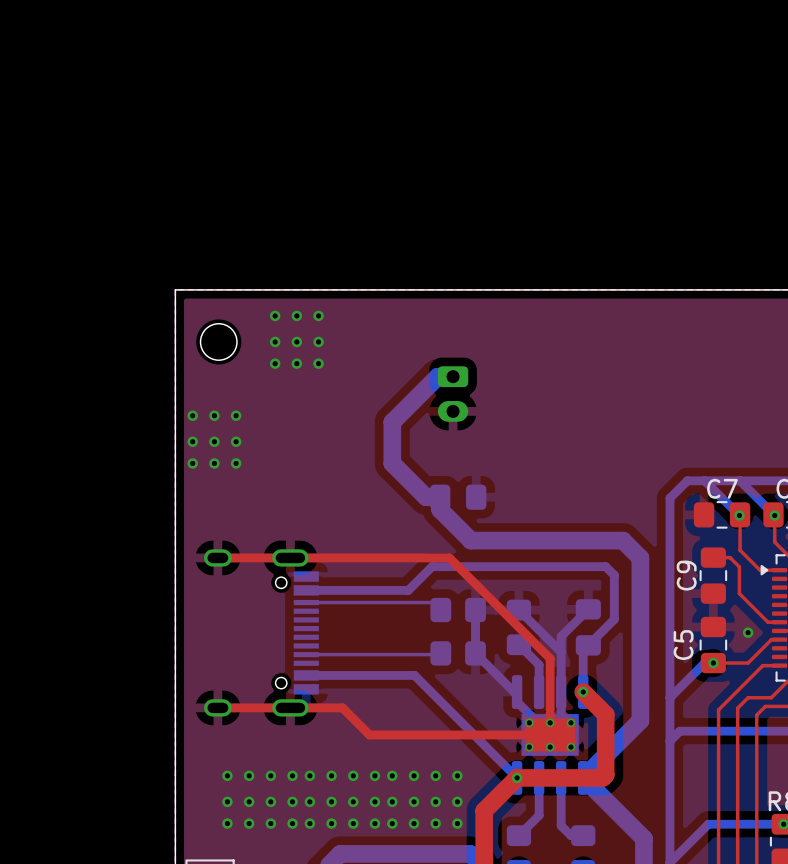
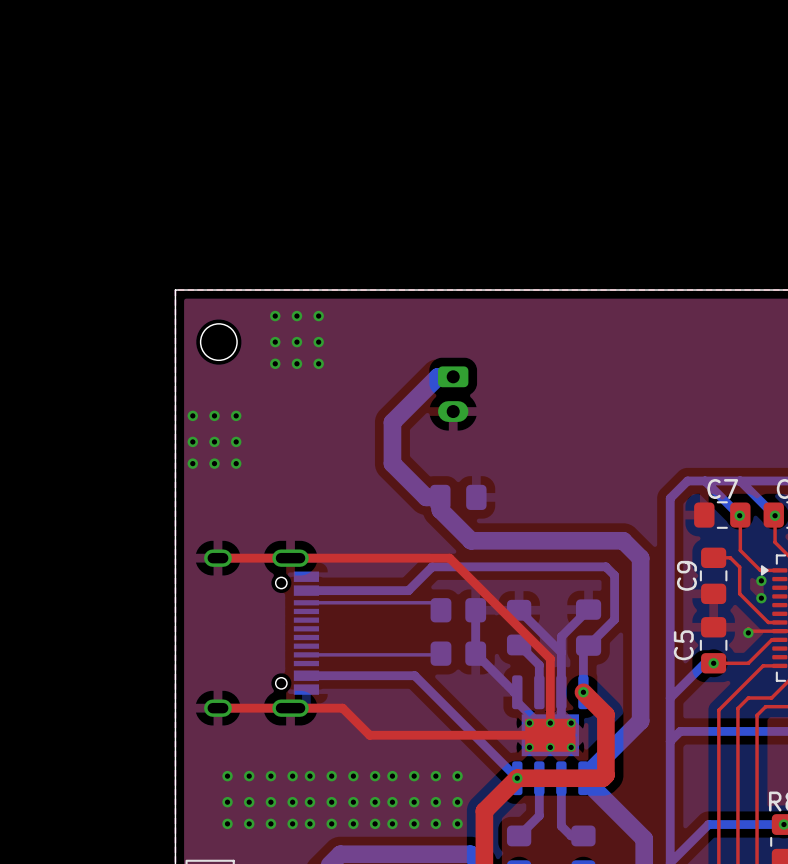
via: none -> (761, 580)
via: none -> (761, 598)
top track: none -> (748, 628) (750, 631) (779, 631)

